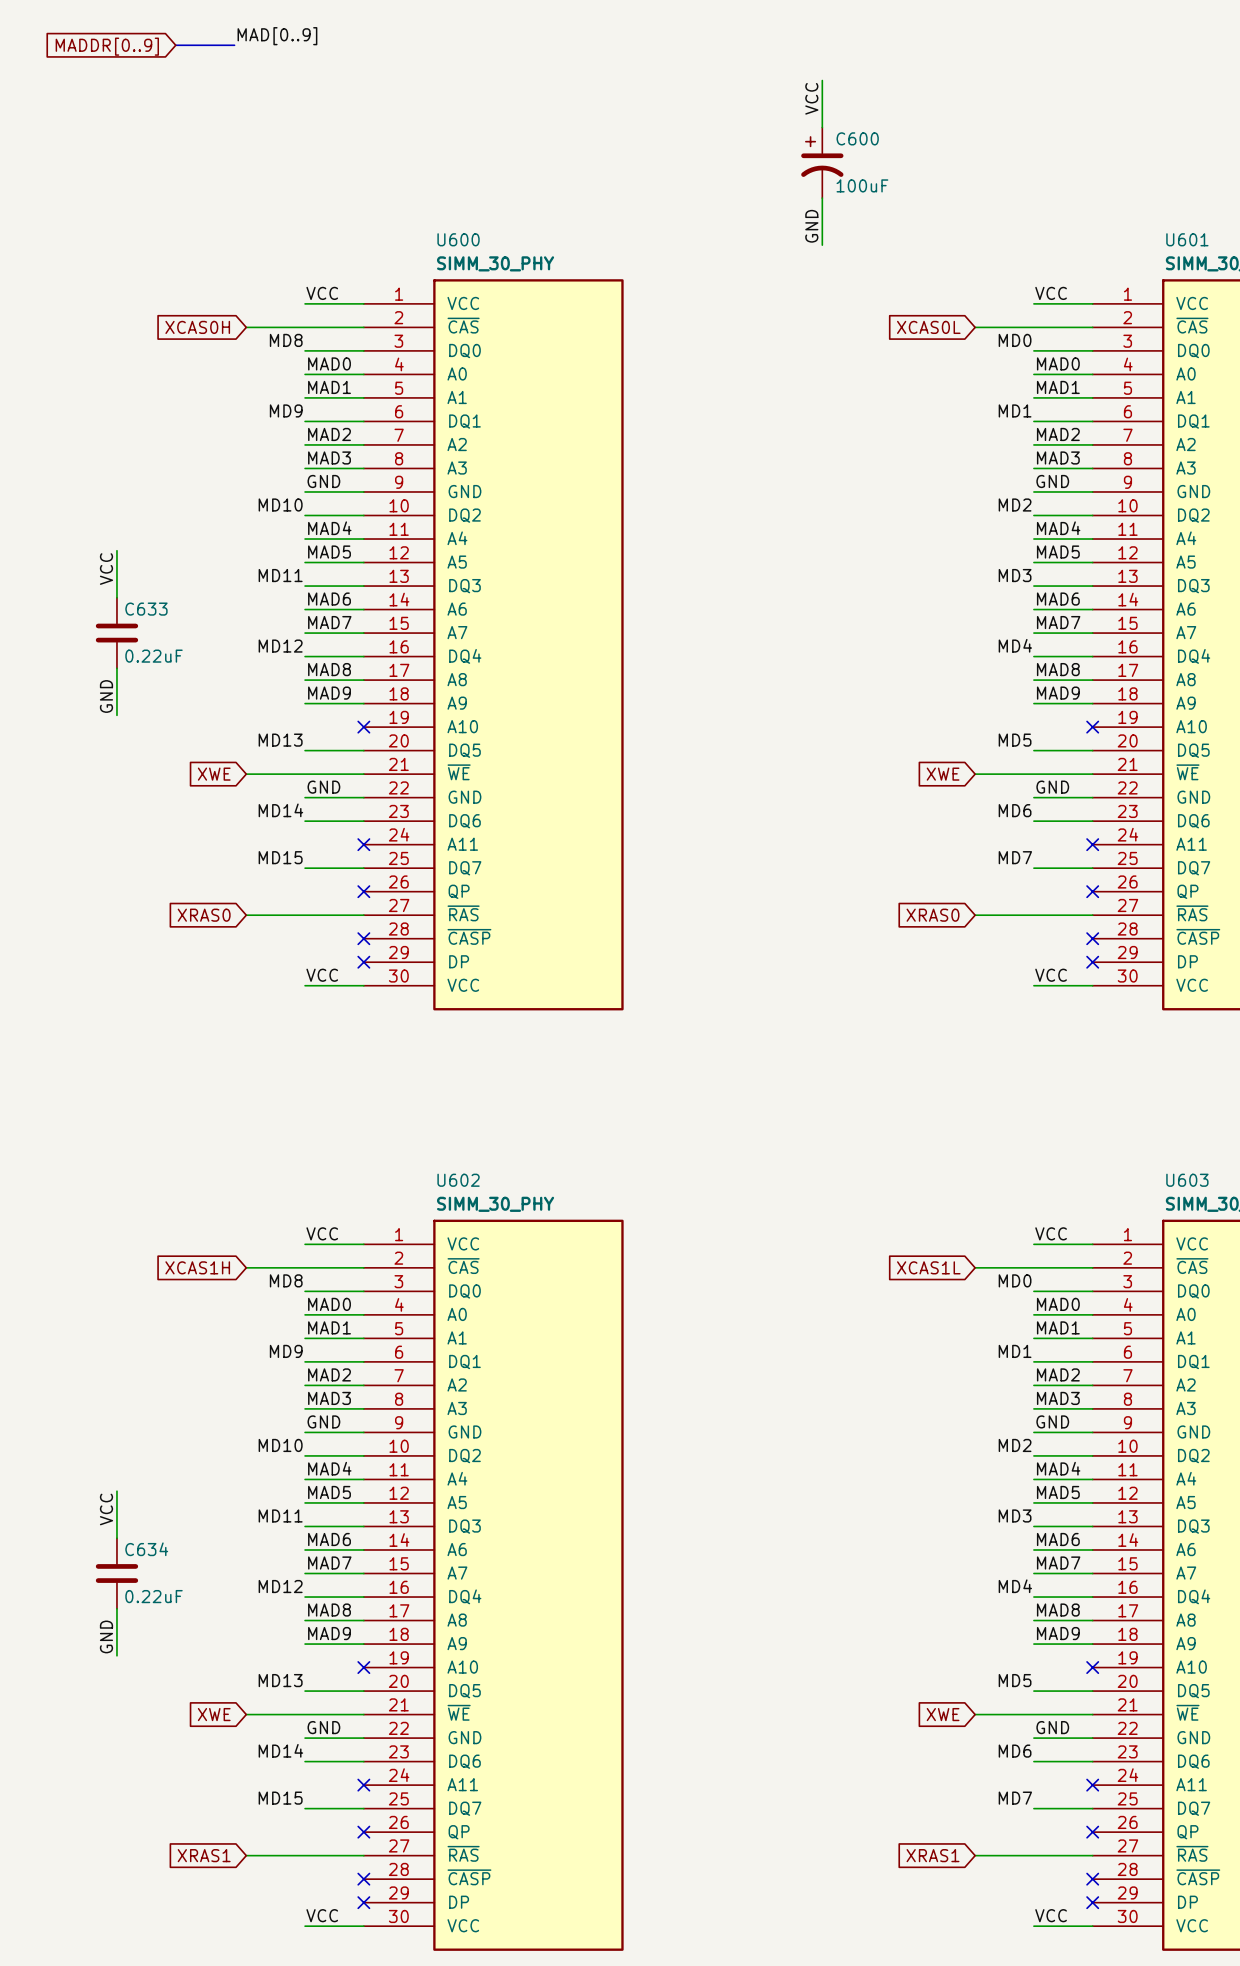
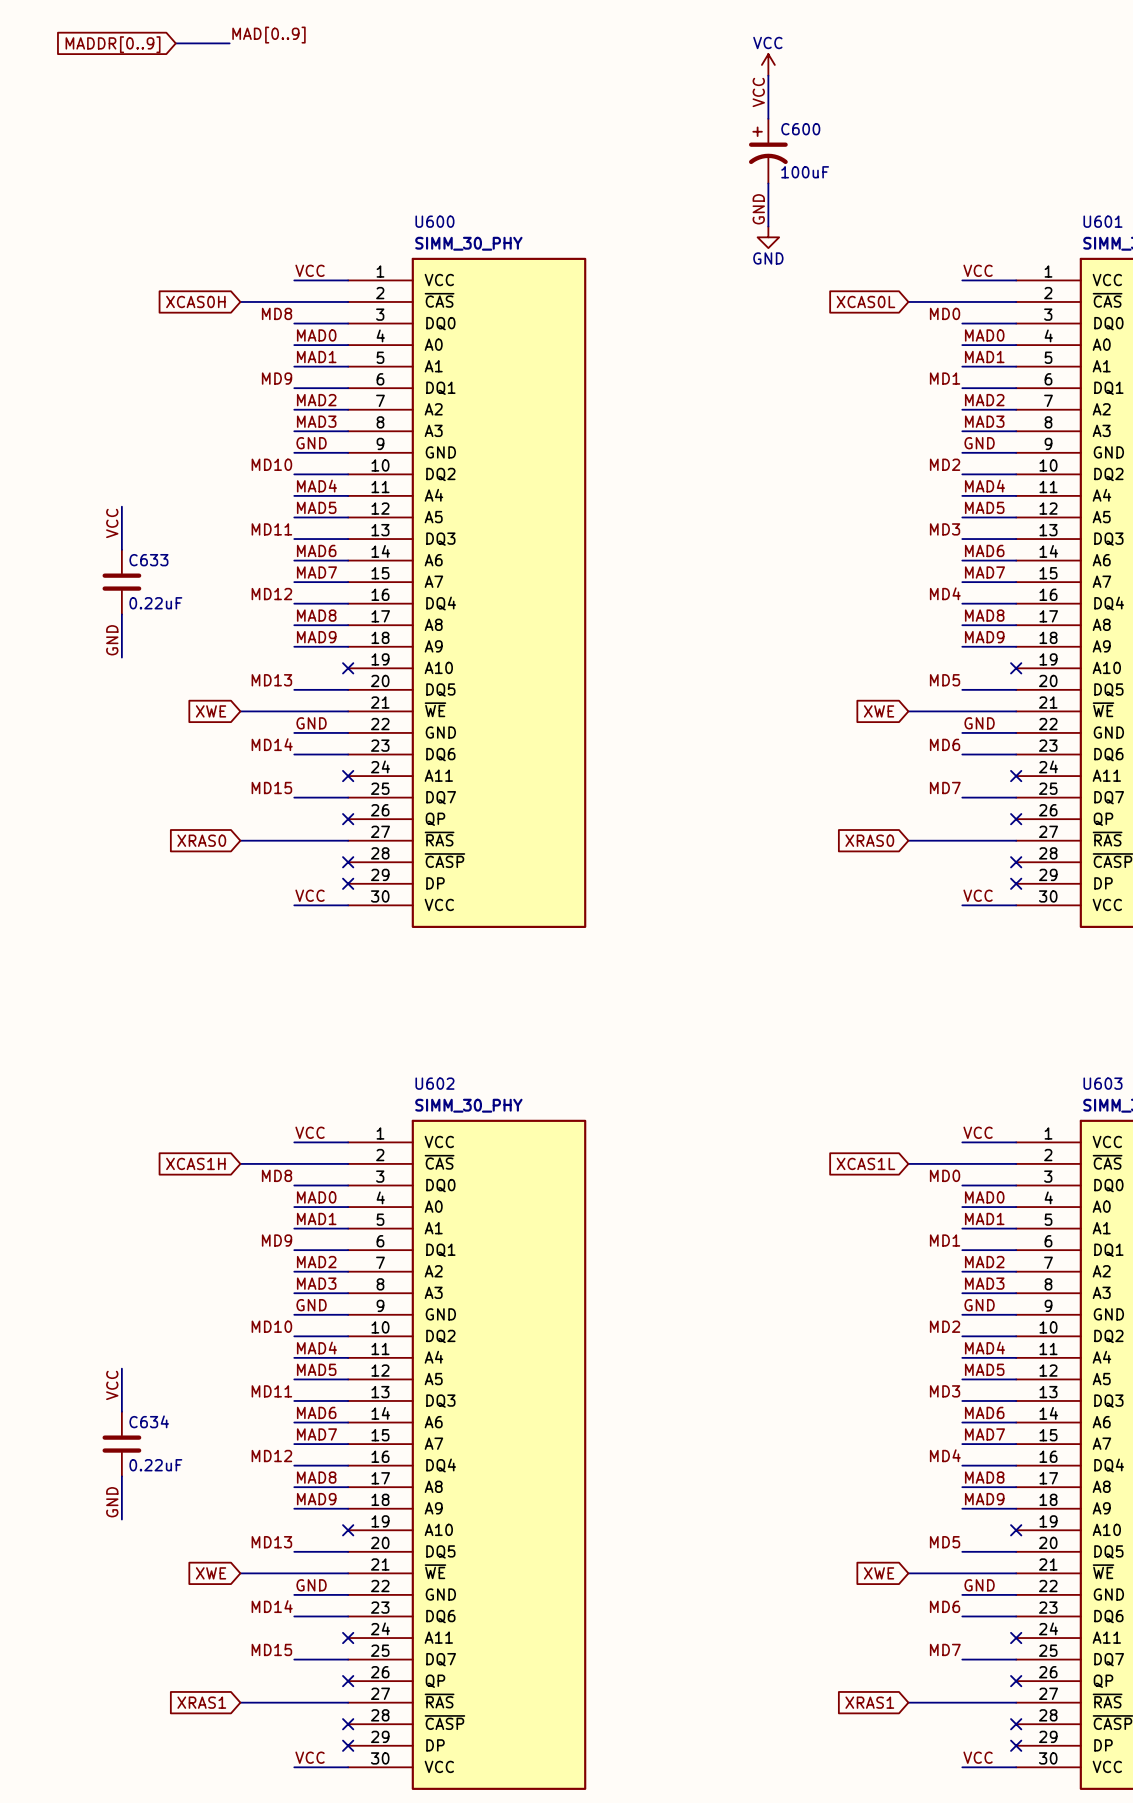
power symbol: none -> VCC (768, 64)
power symbol: none -> GND (768, 237)

